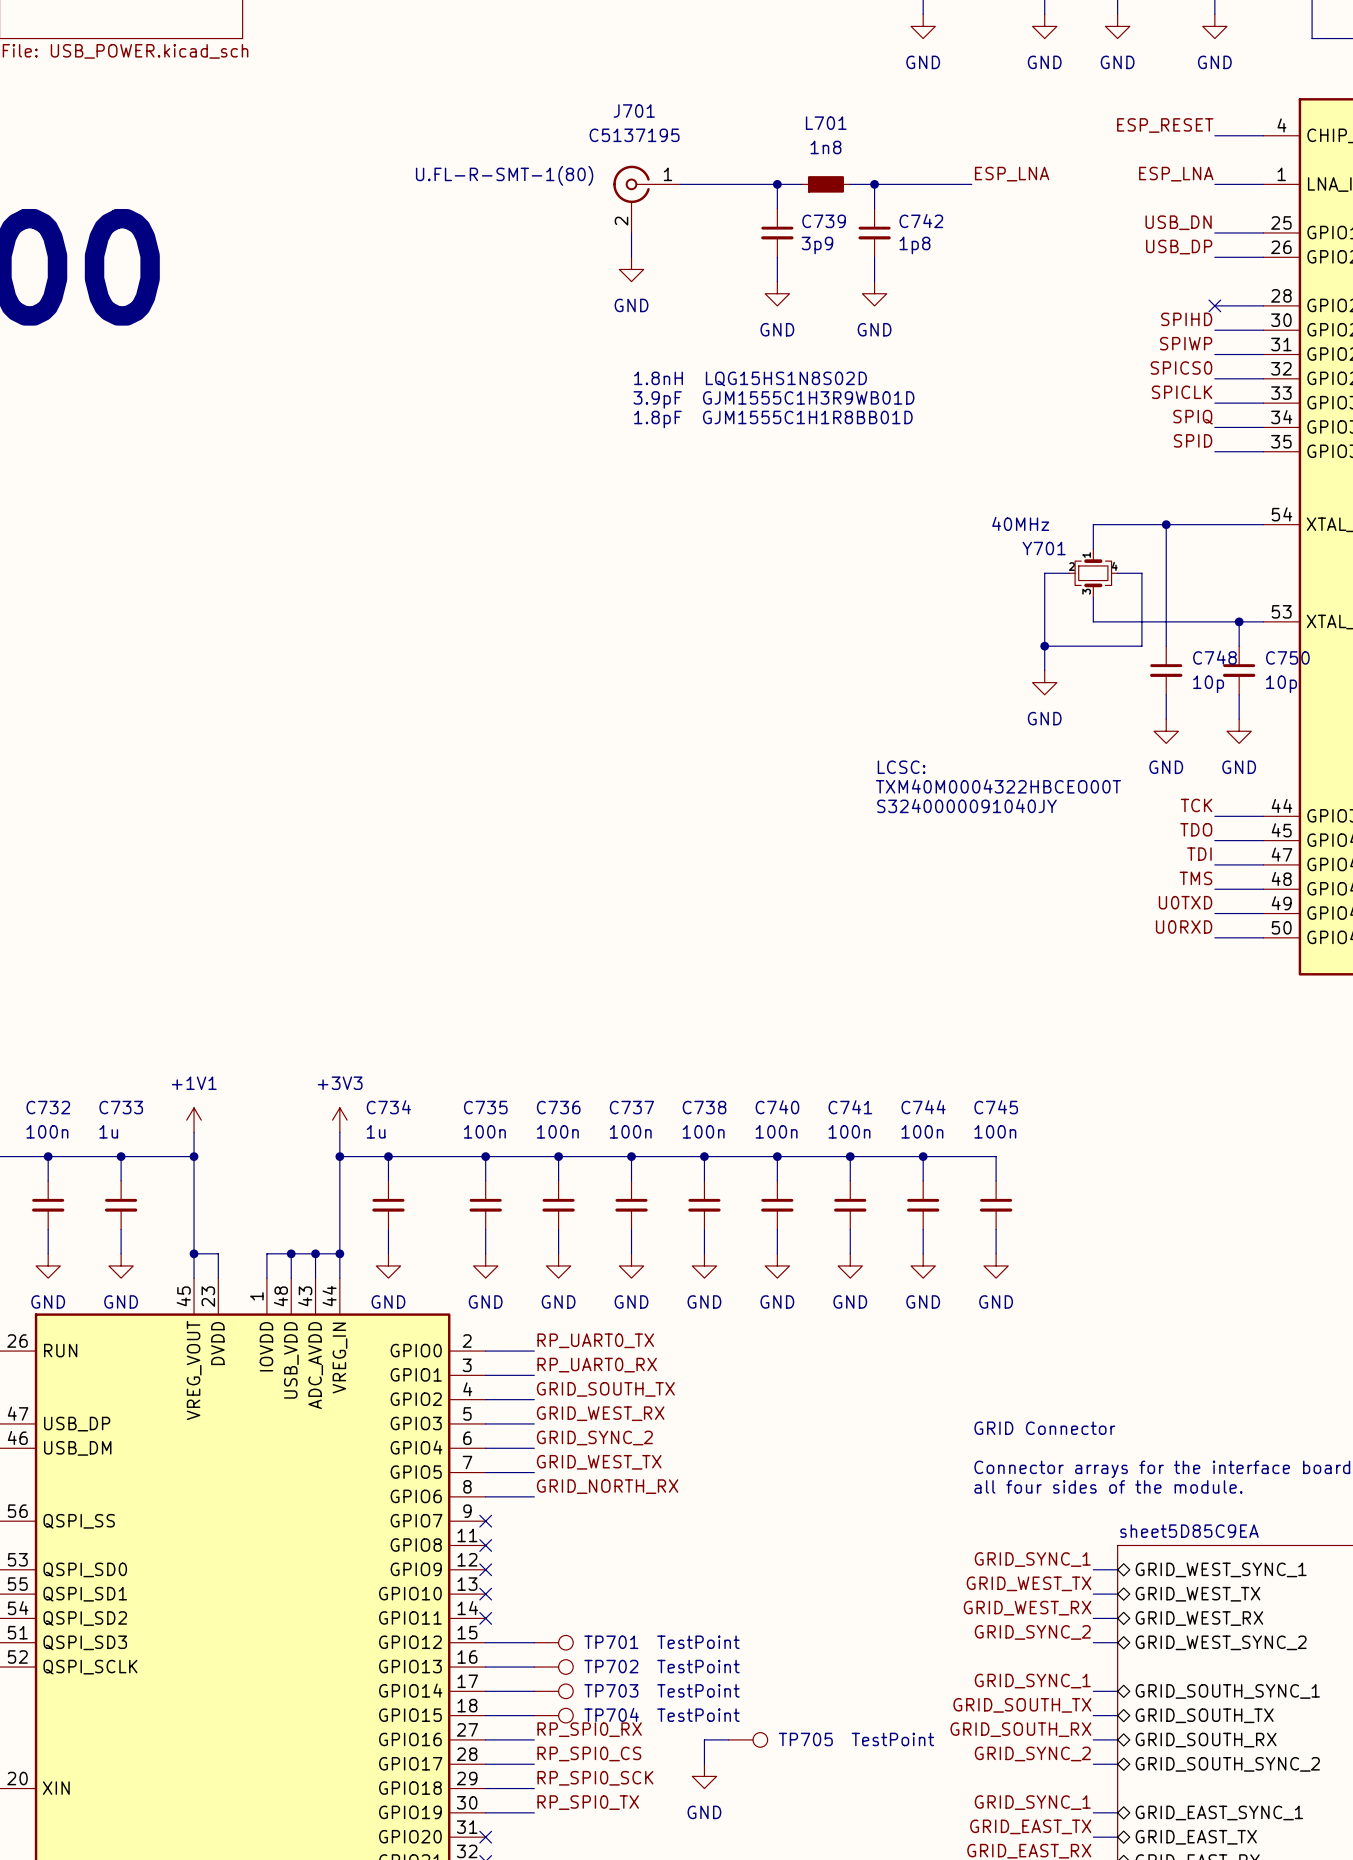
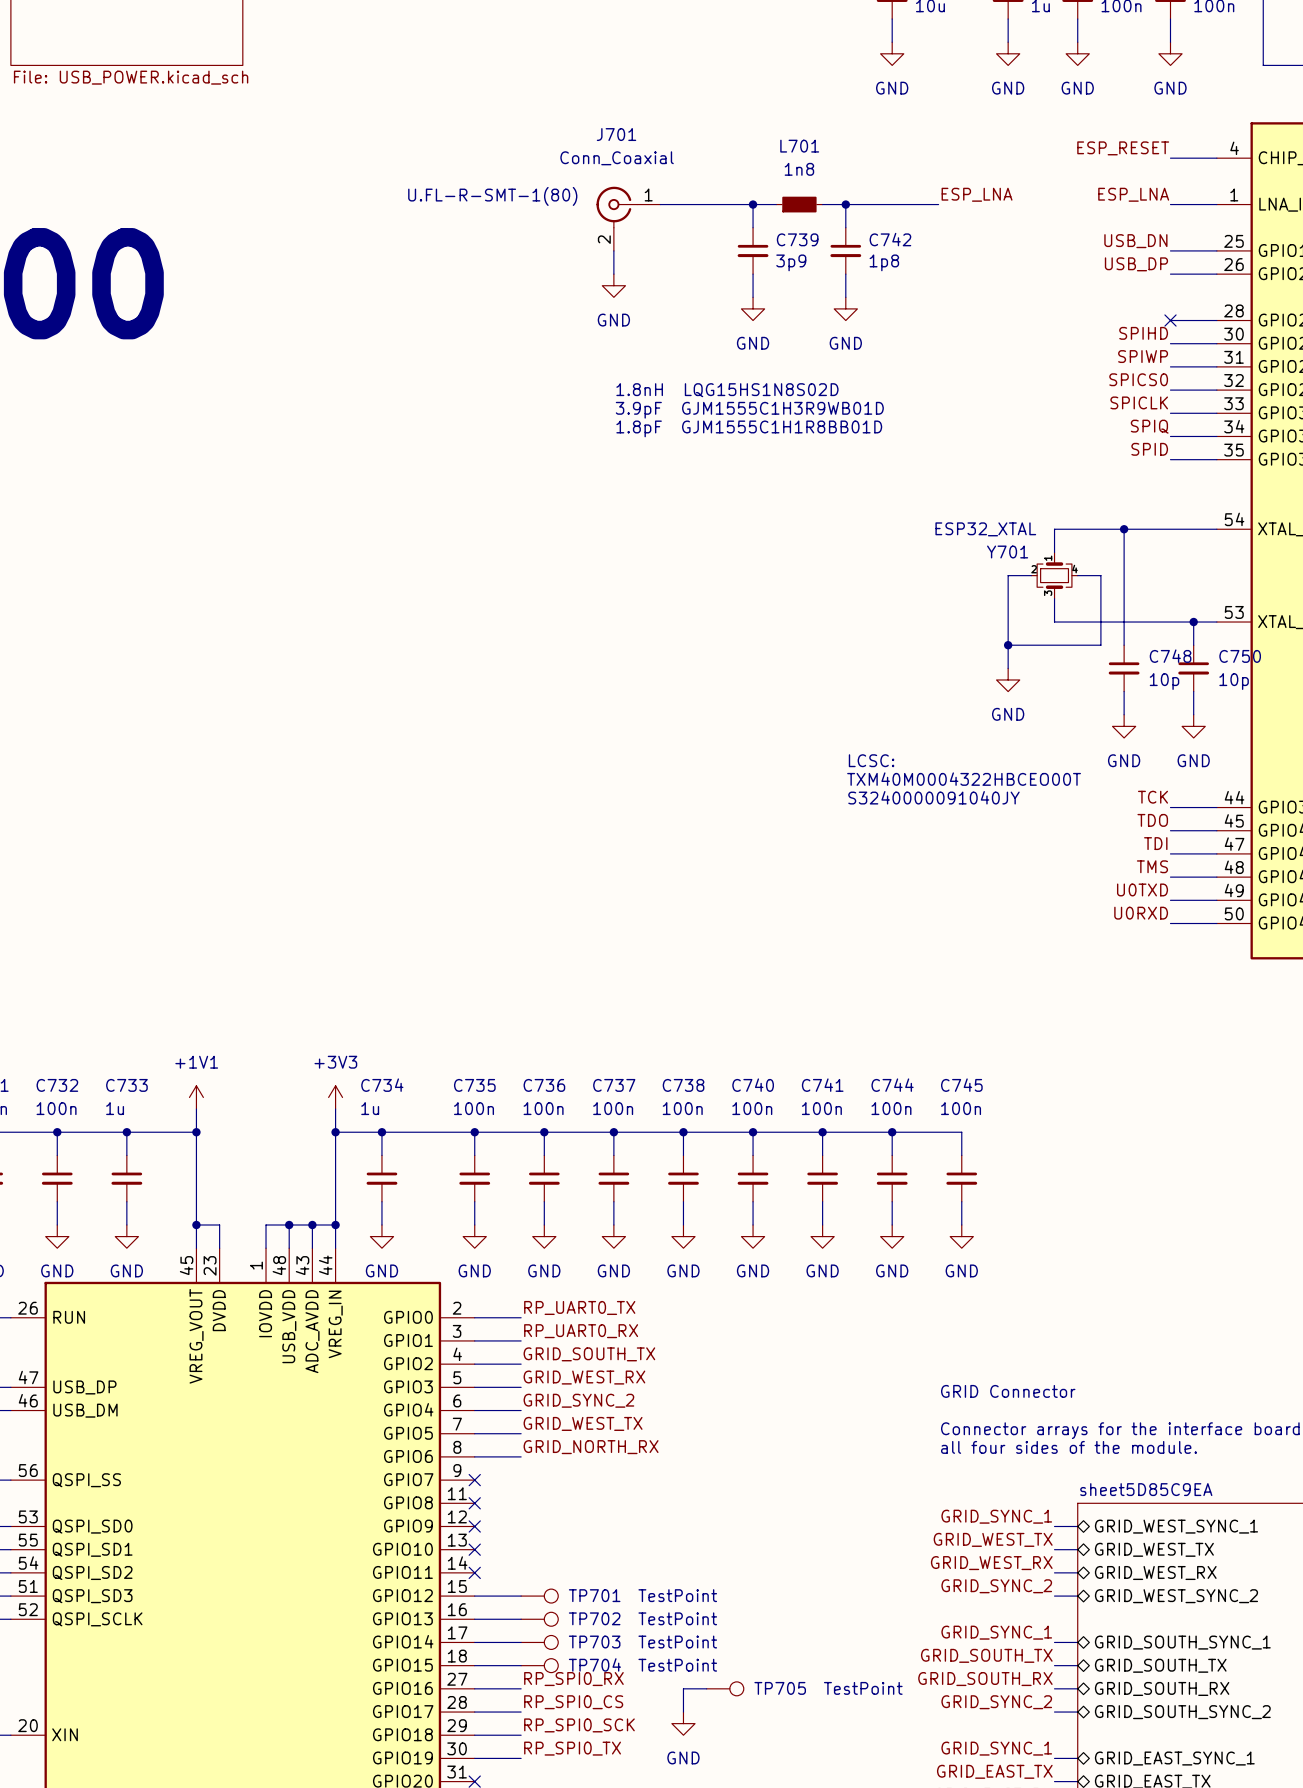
J701 value: C5137195 (634, 135) -> Conn_Coaxial (617, 158)
Y701 value: 40MHz (1020, 523) -> ESP32_XTAL (985, 529)

